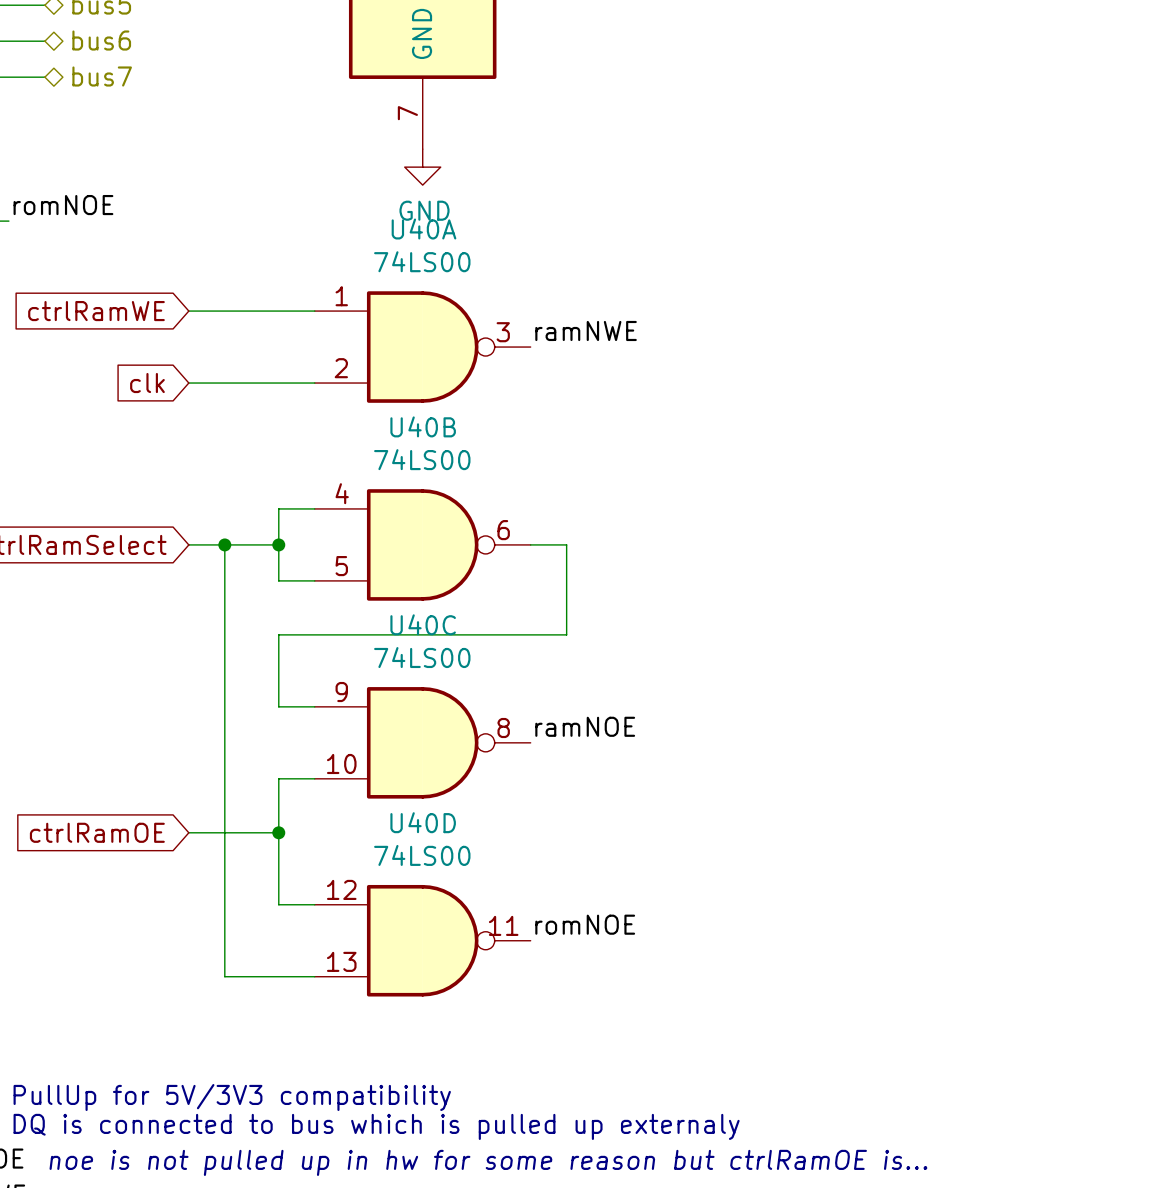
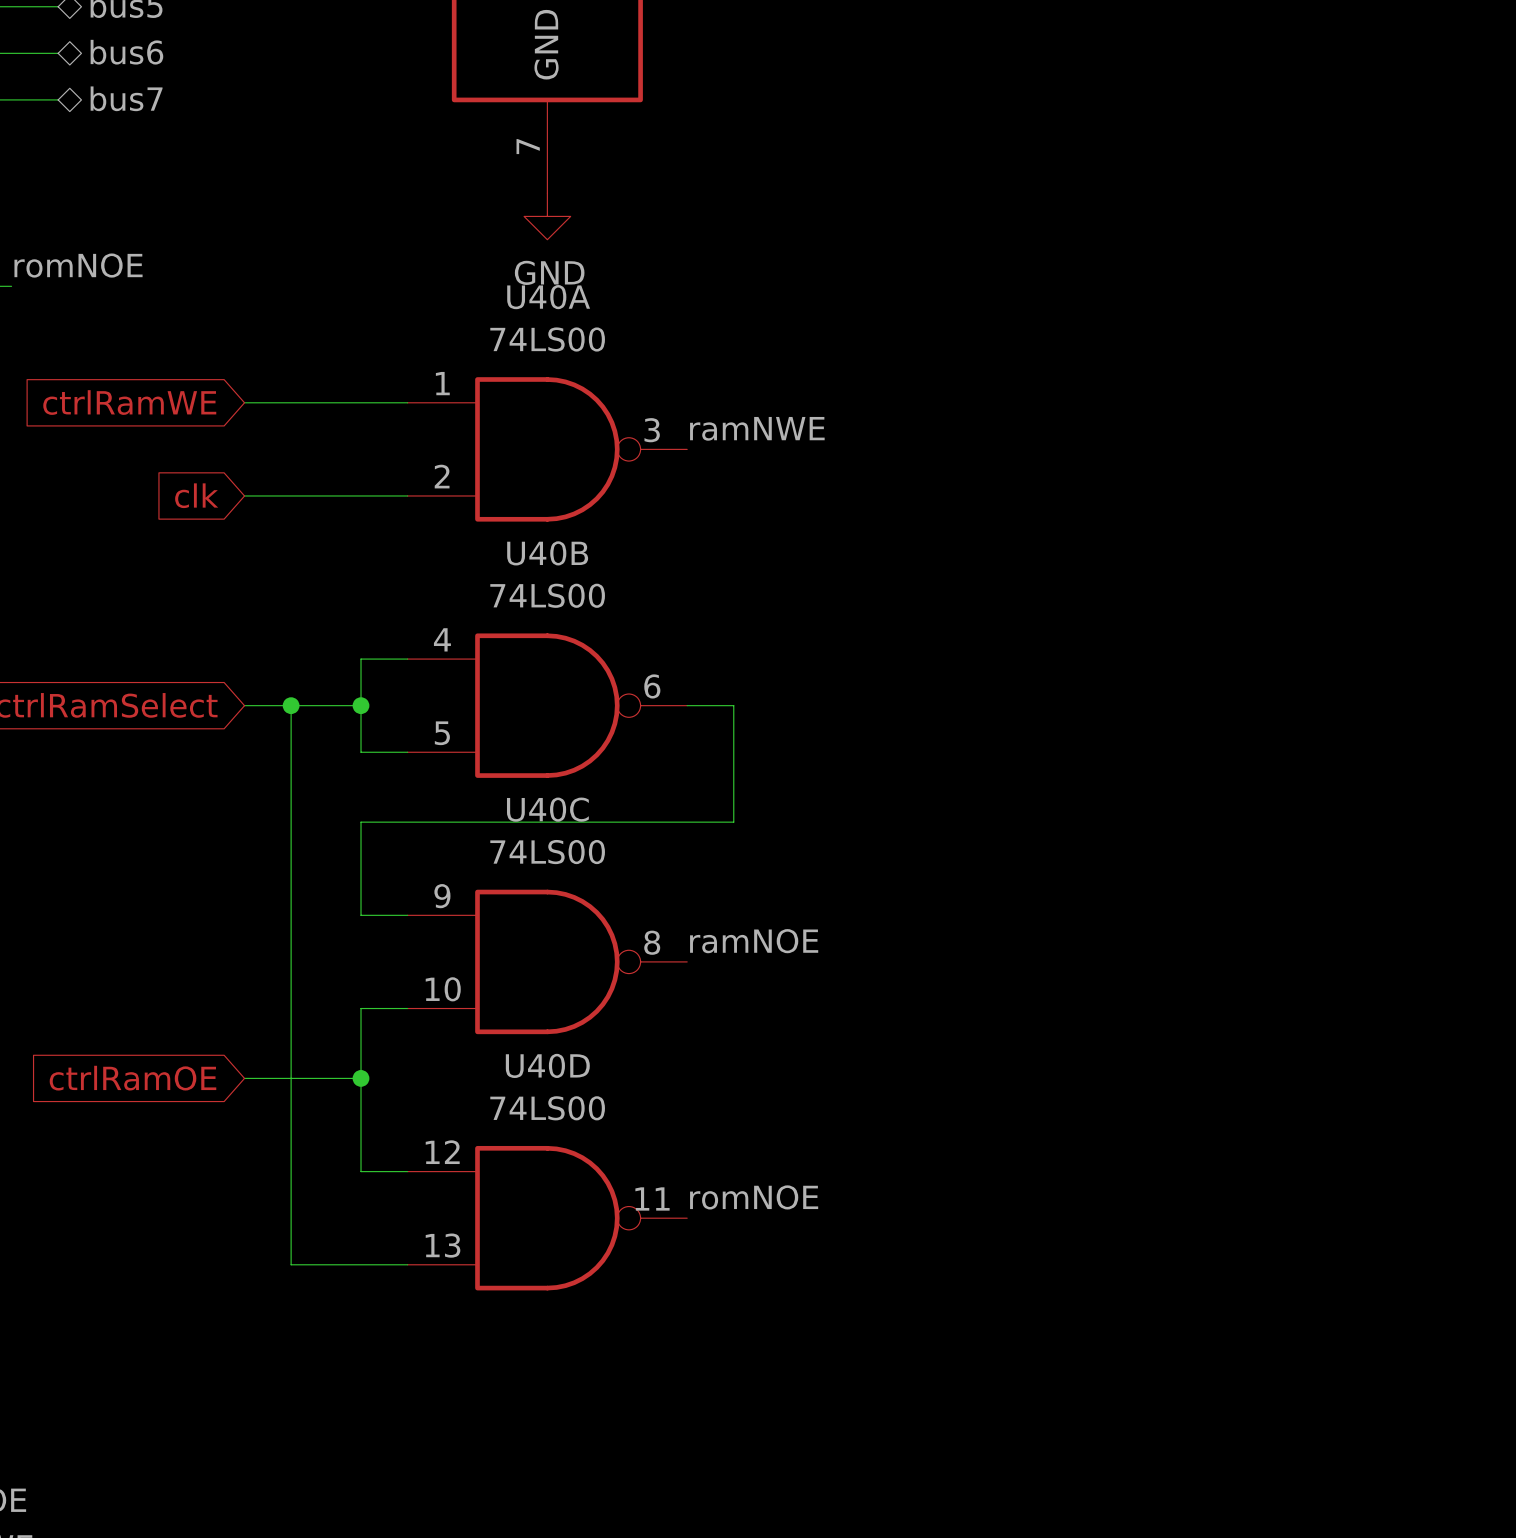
text: PullUp for 5V/3V3 compatibility (232, 1097) -> none
text: DQ is connected to bus which is pulled up externaly (376, 1126) -> none
text: noe is not pulled up in hw for some reason but ctrlRamOE is... (488, 1162) -> none

